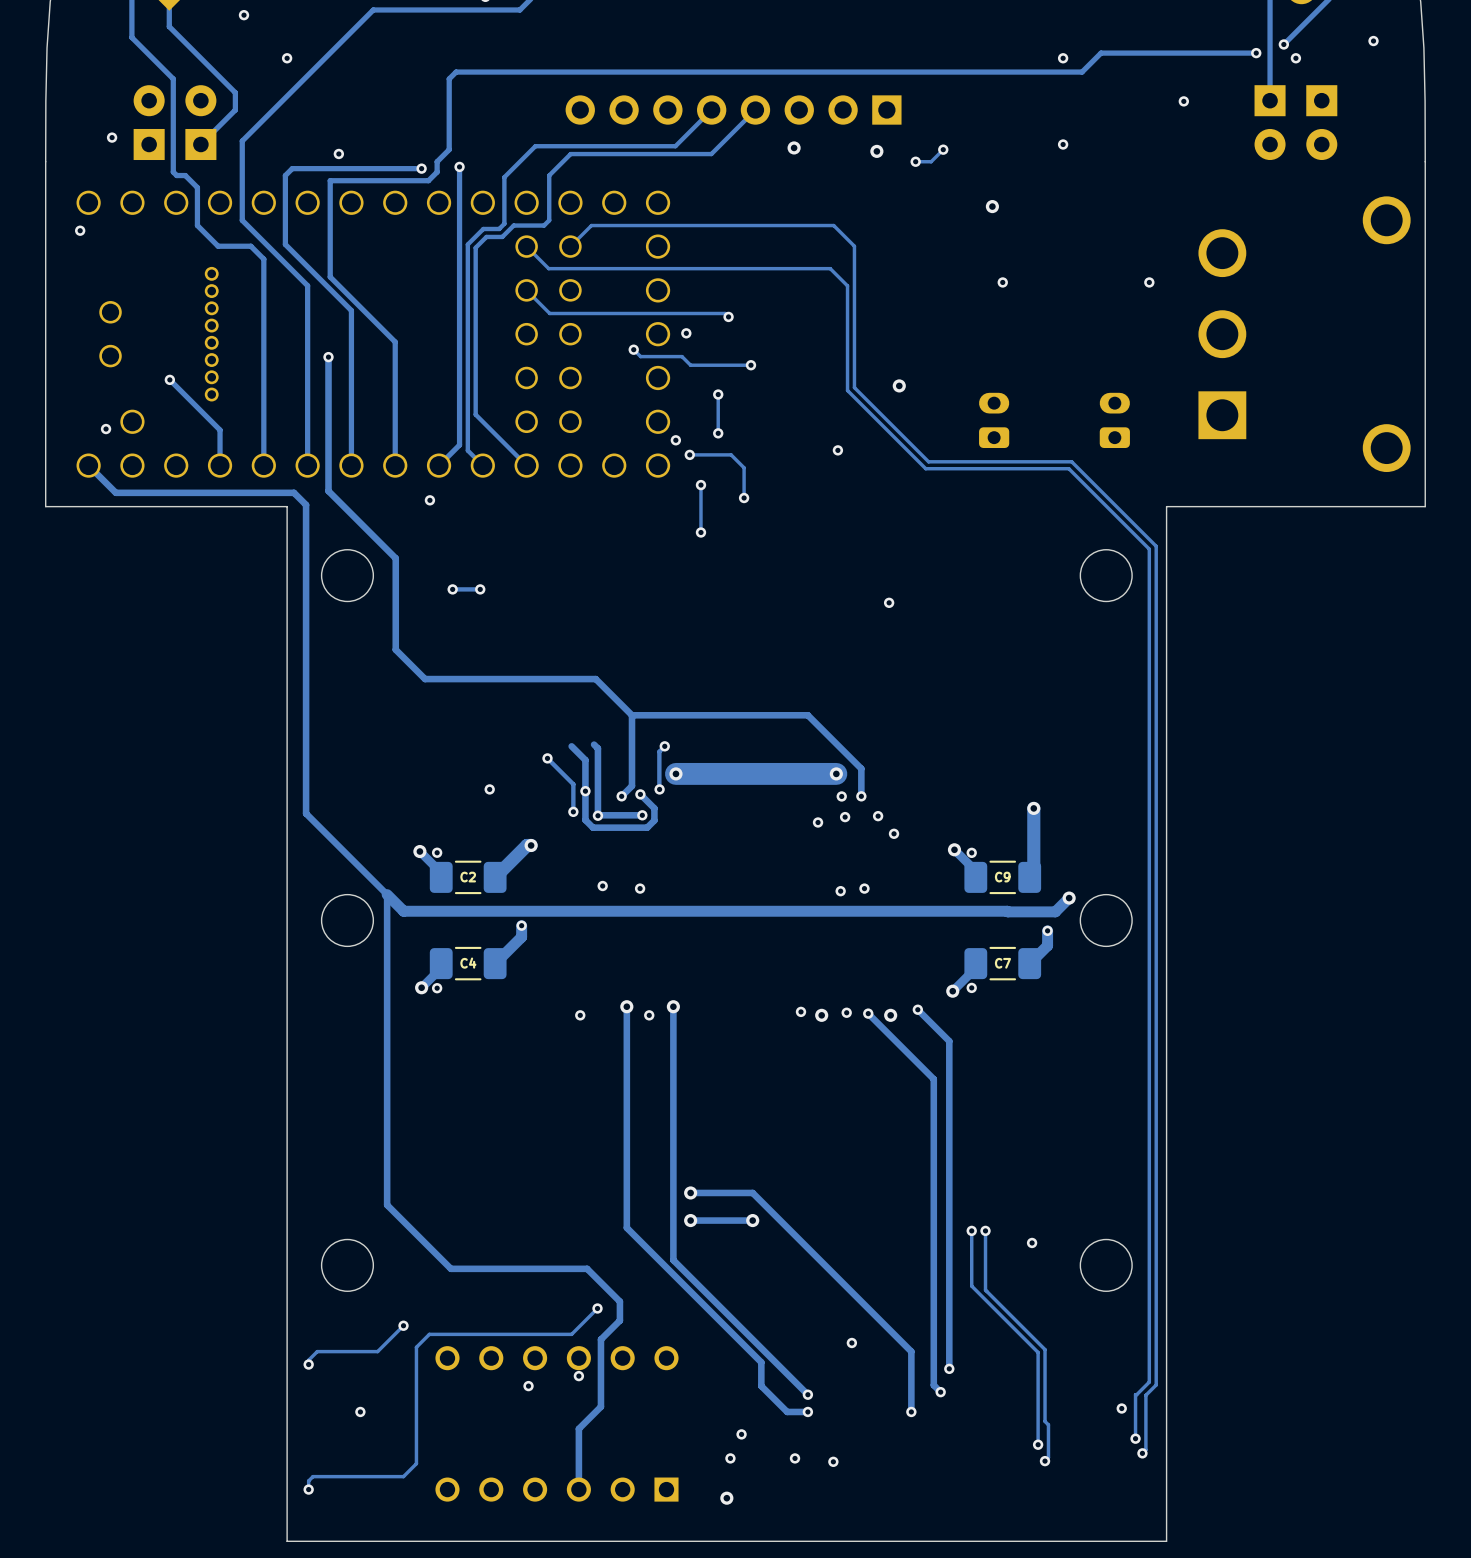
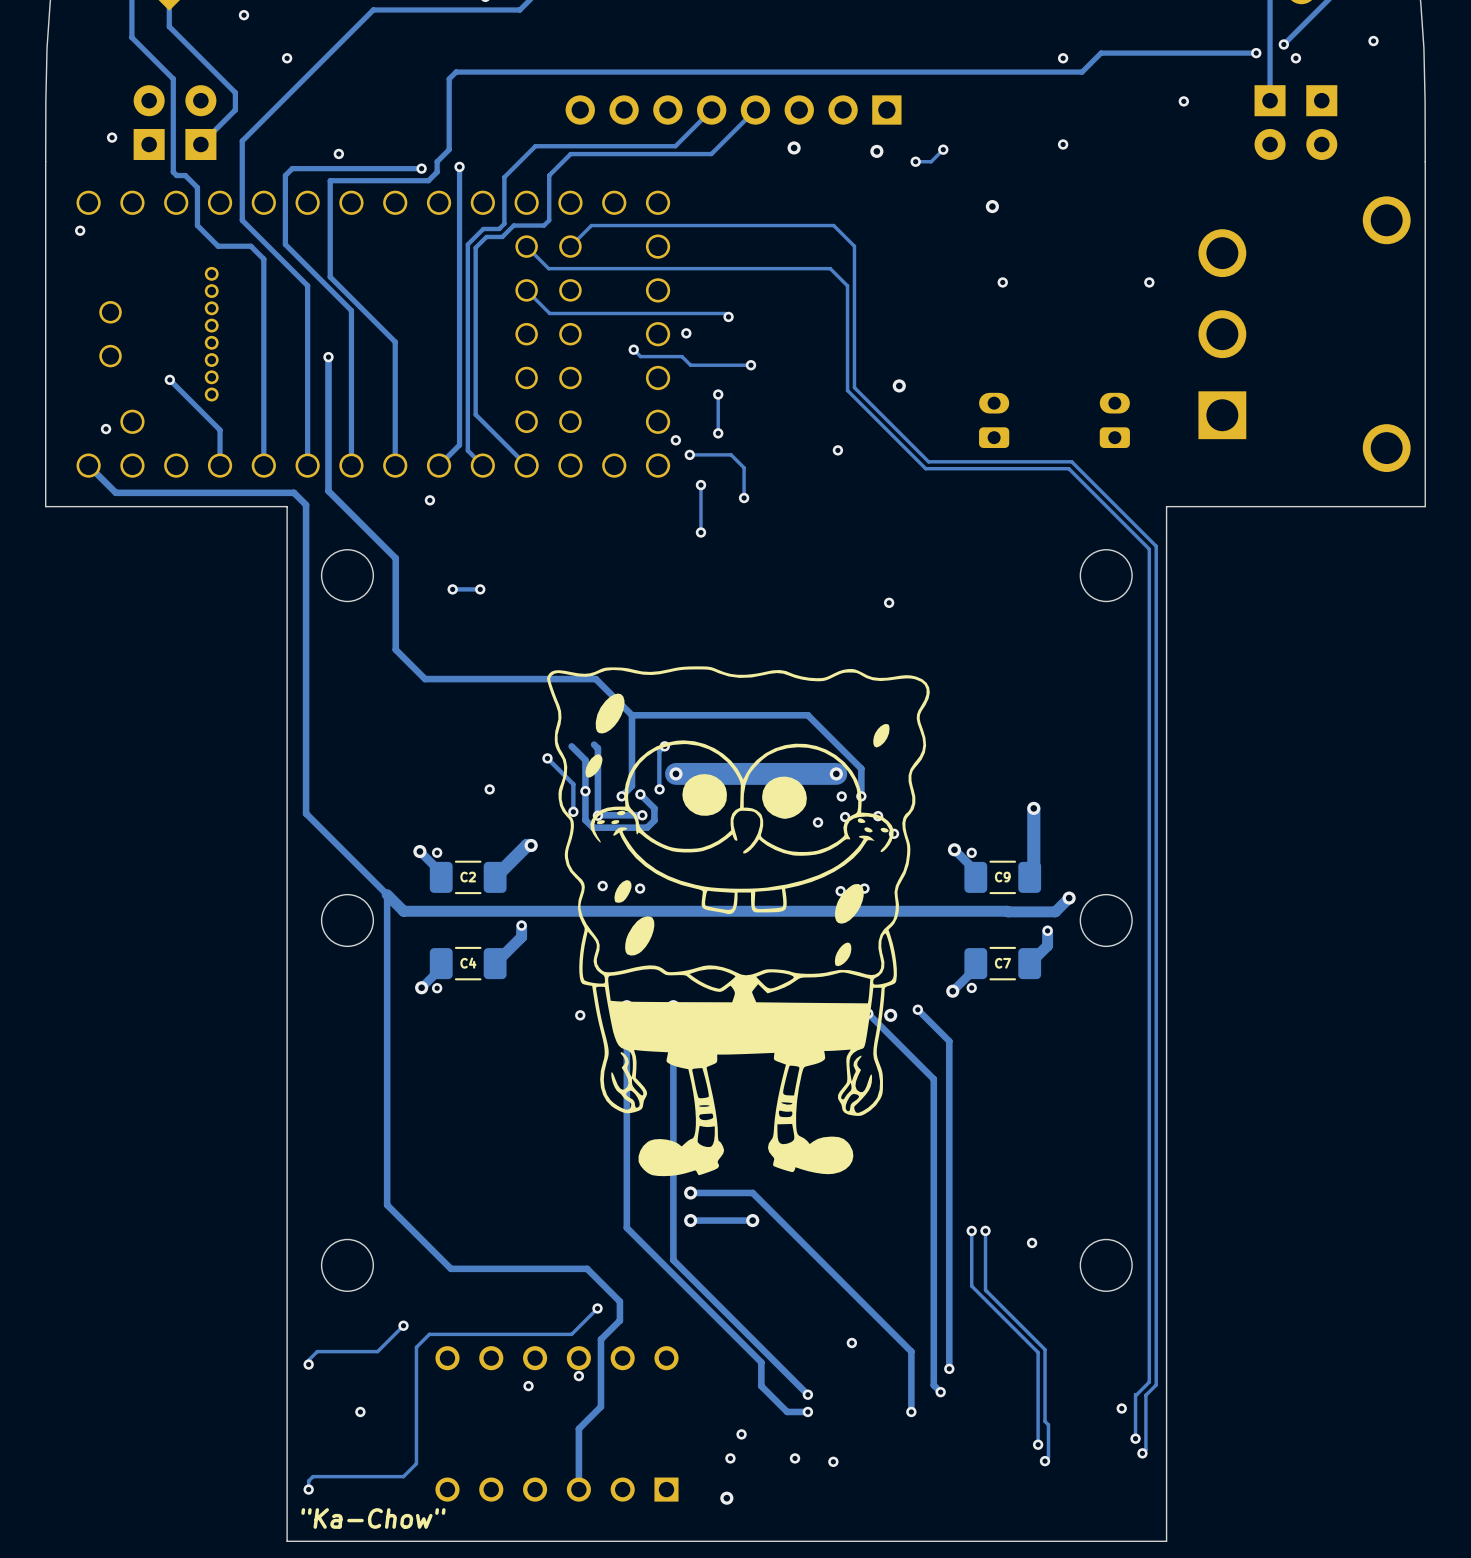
drawing: none -> [547, 666, 930, 1177]
text: none -> "Ka-Chow" (373, 1518)

